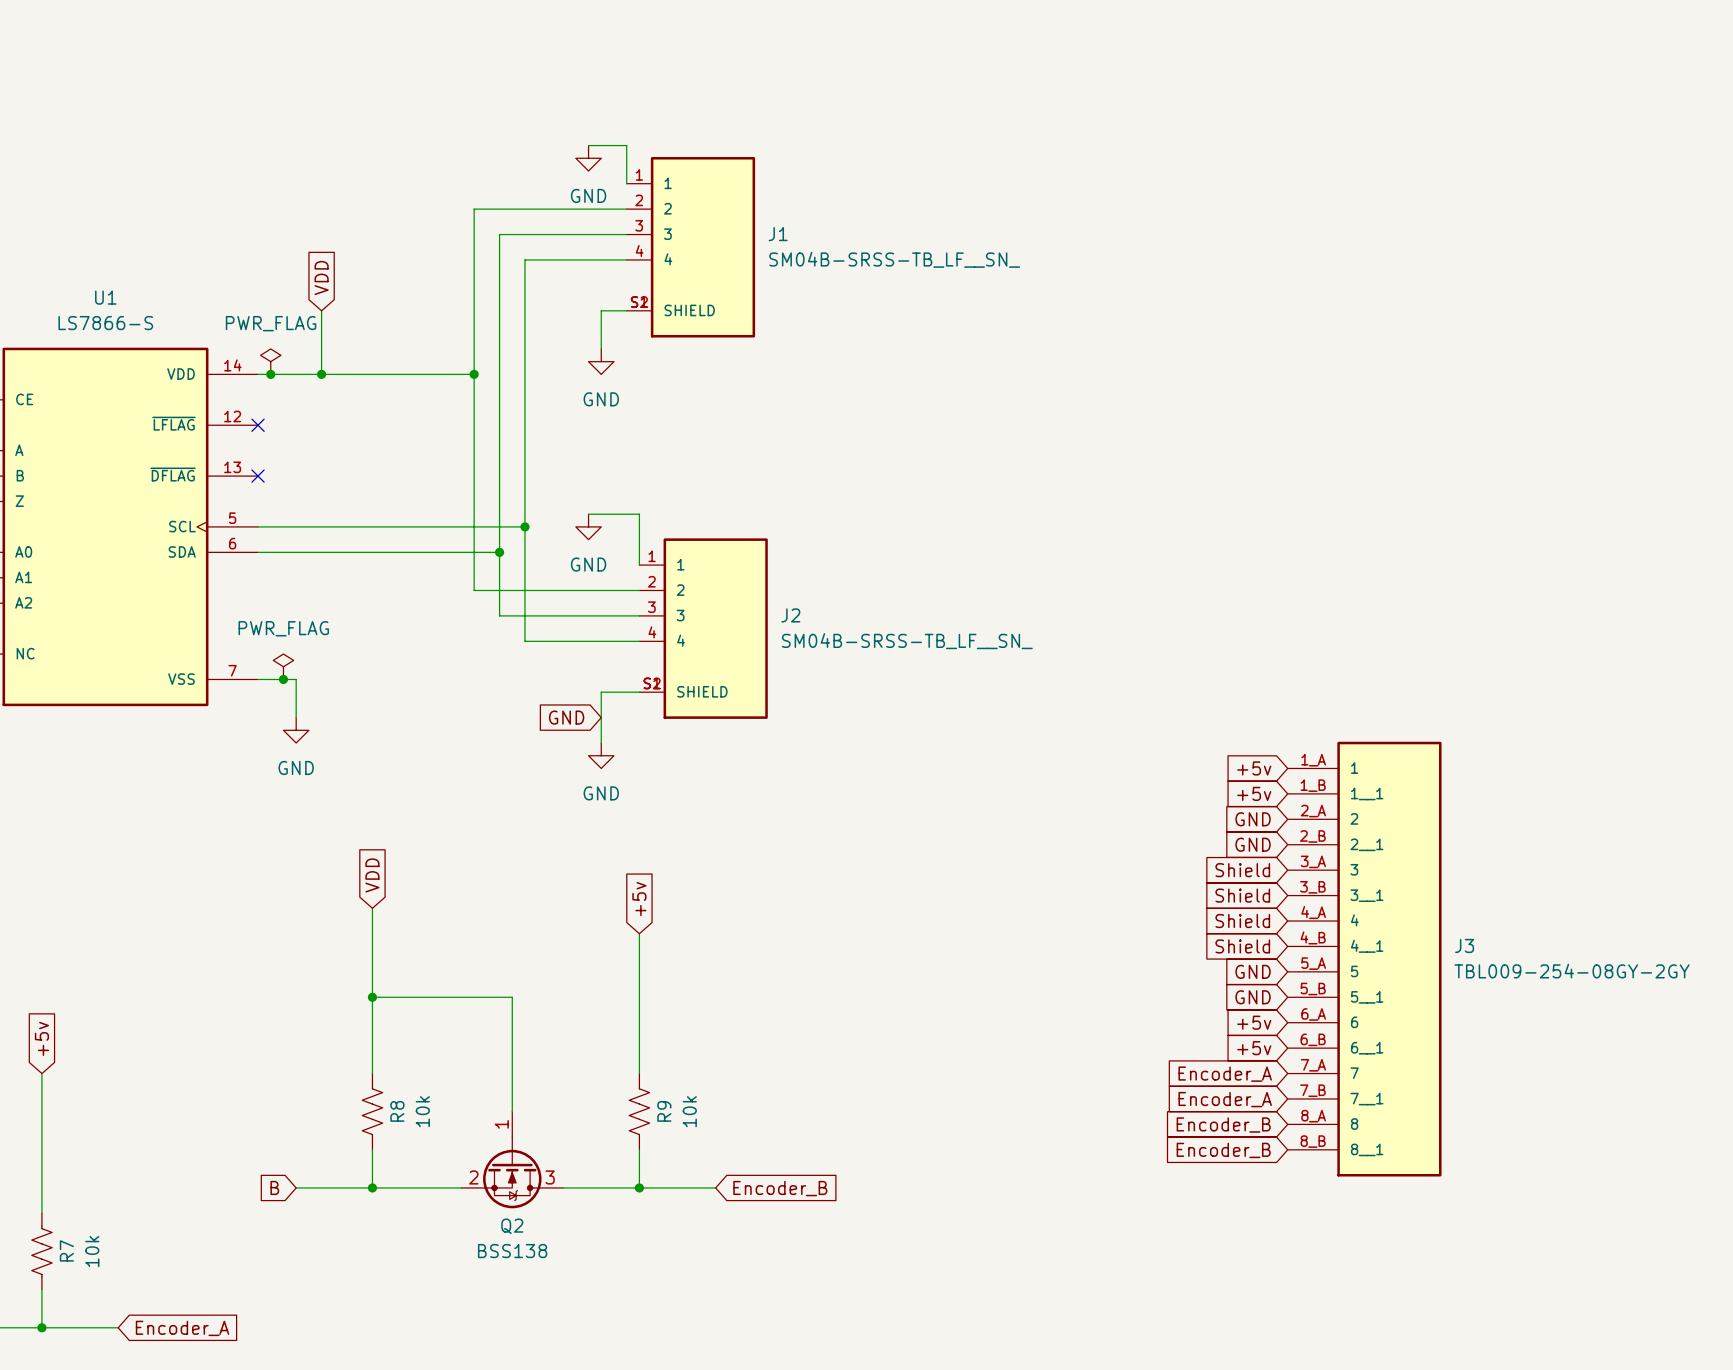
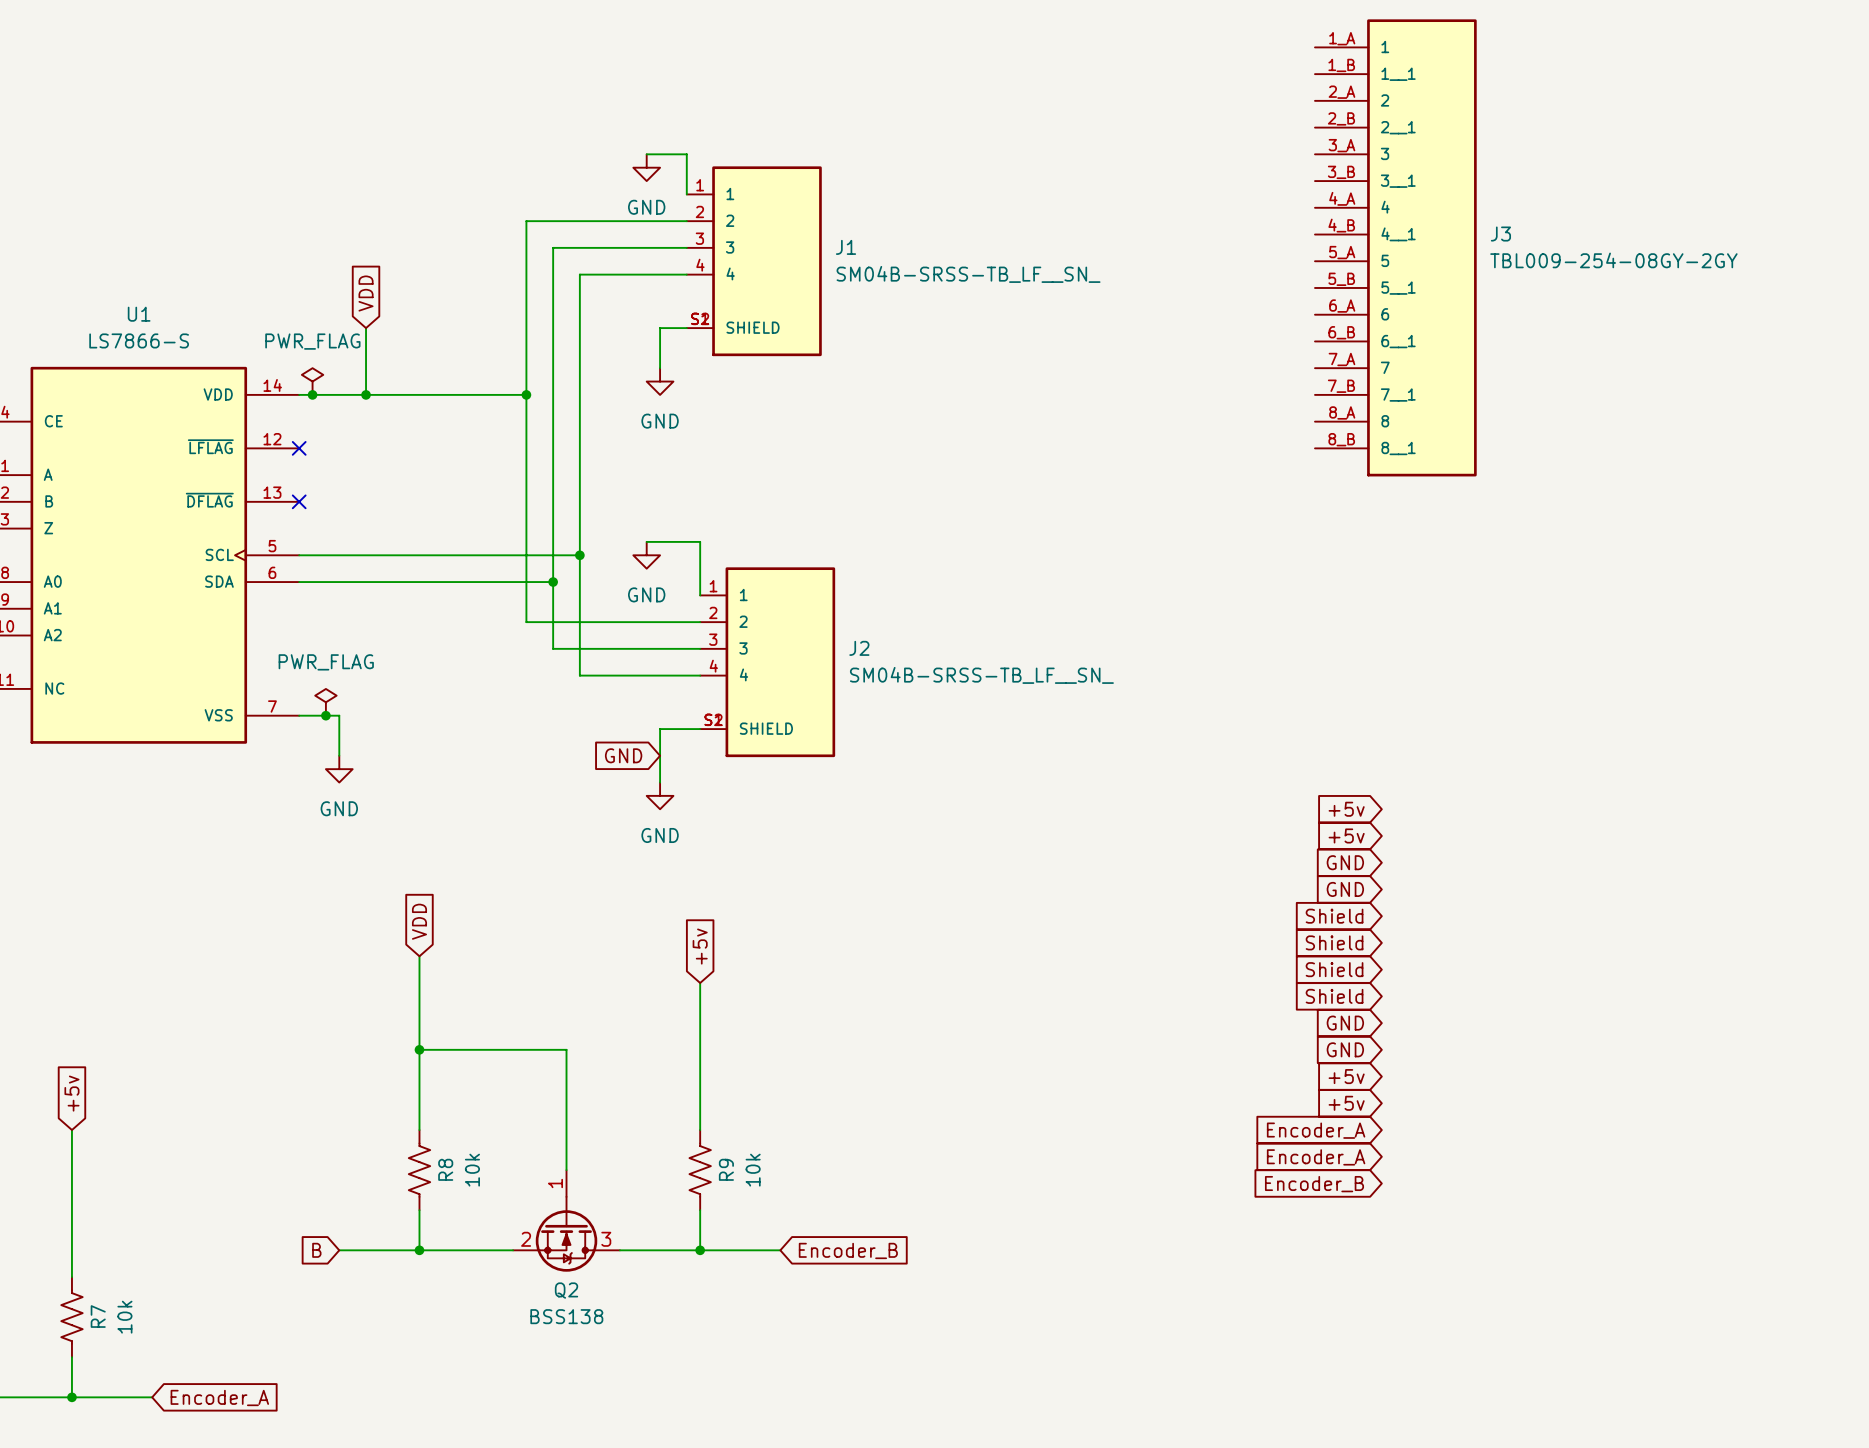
J3 position: (1364, 959) -> (1395, 247)
global label: Encoder_B (1223, 1150) -> none

